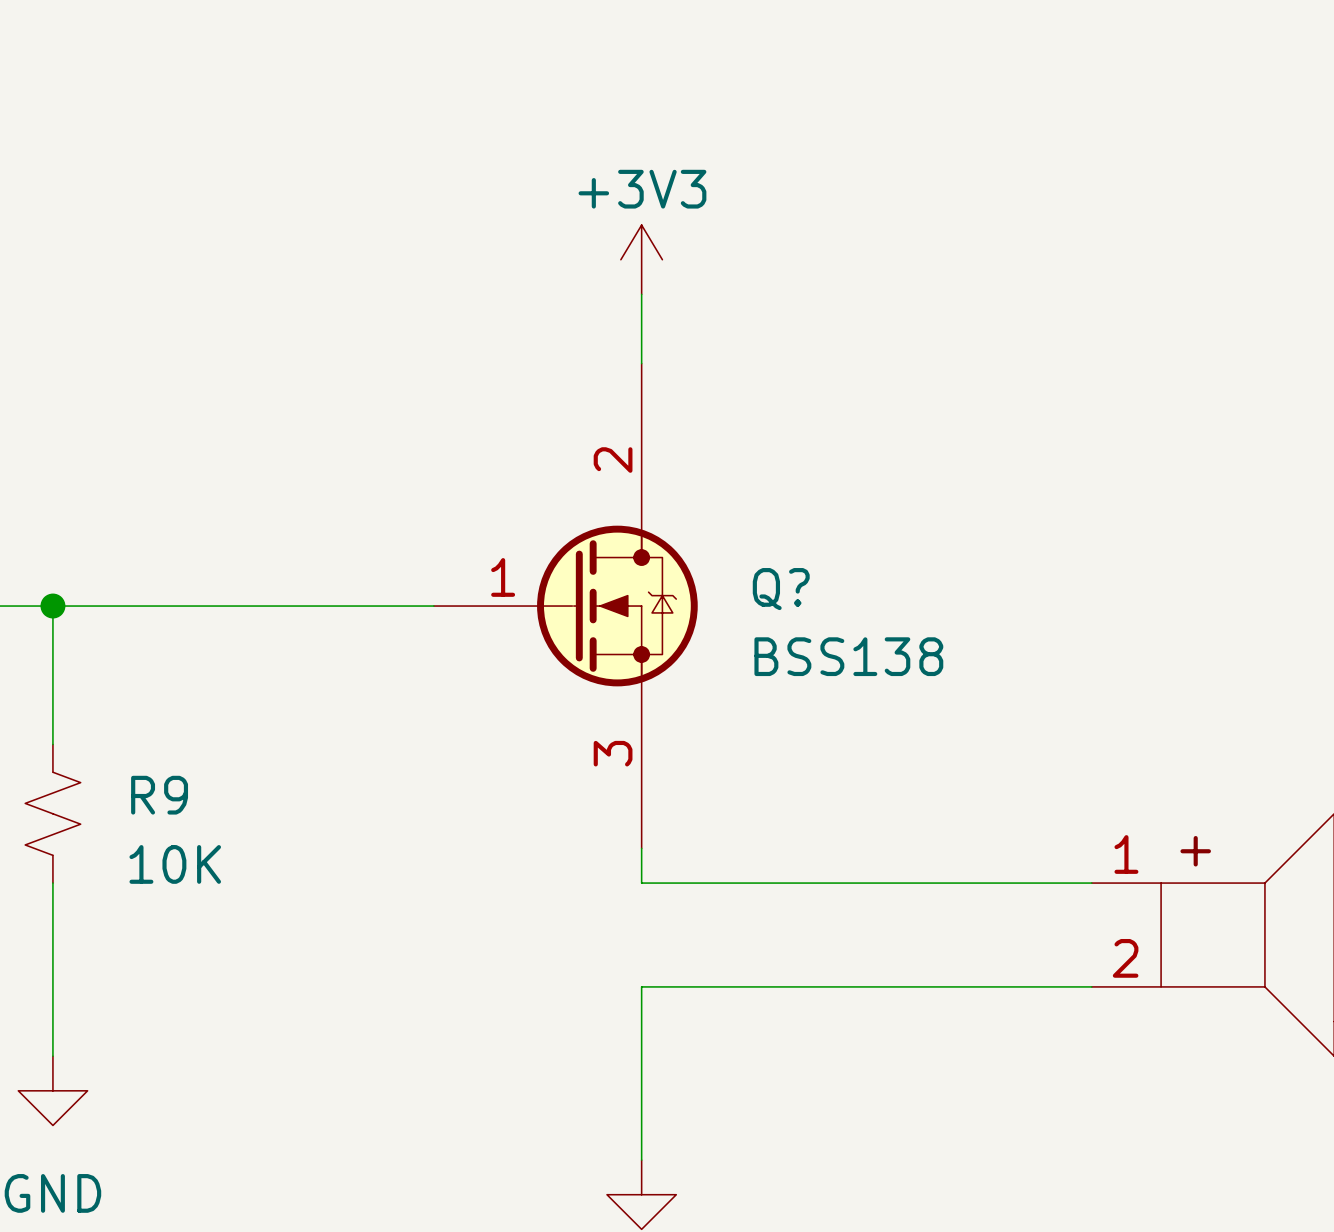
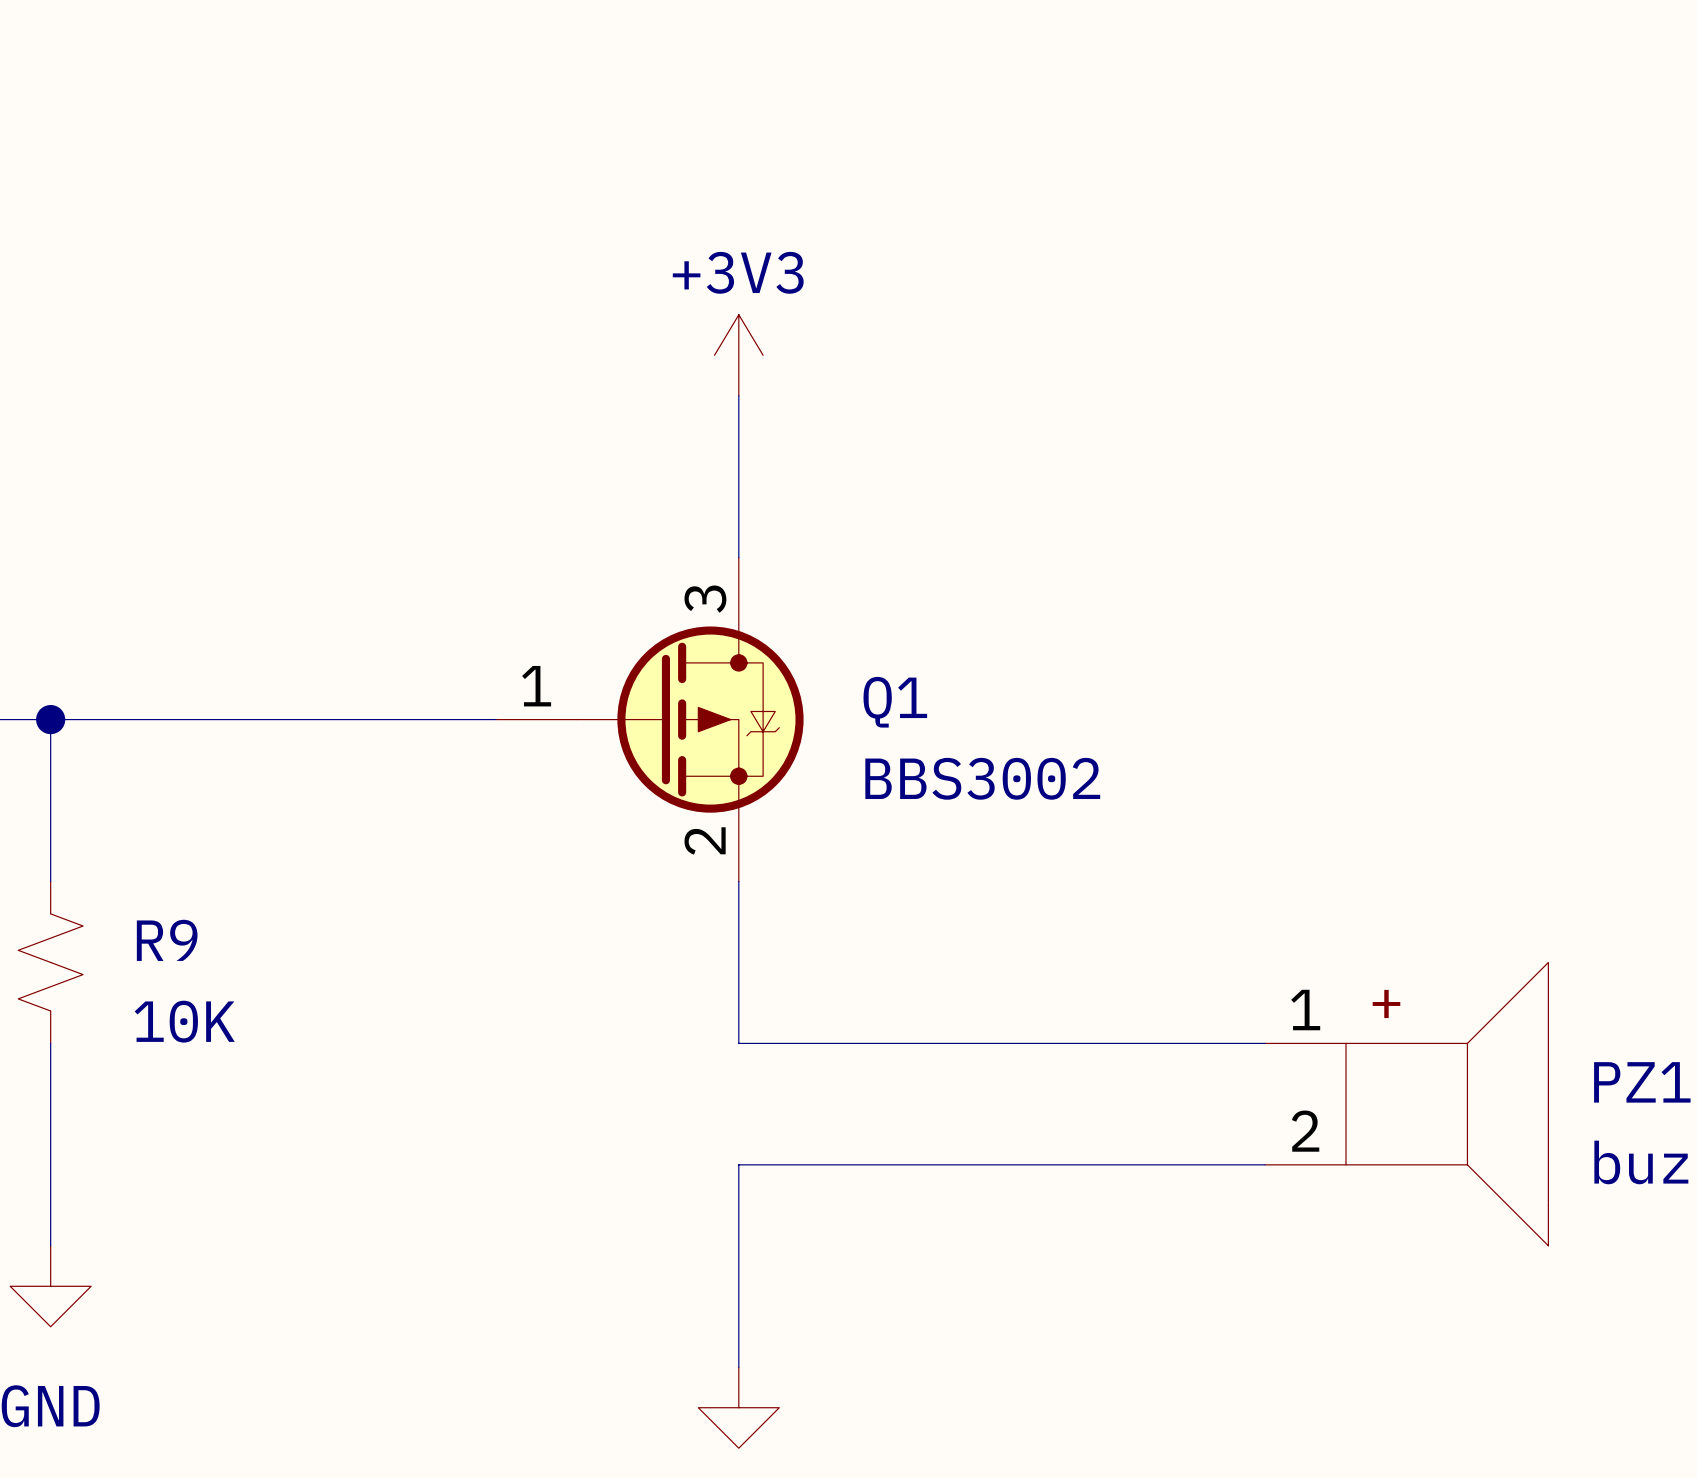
power symbol position: +3V3 (641, 259) -> +3V3 (738, 355)
Q?: BSS138 (565, 606) -> none
Q1: none -> BBS3002 (649, 719)

